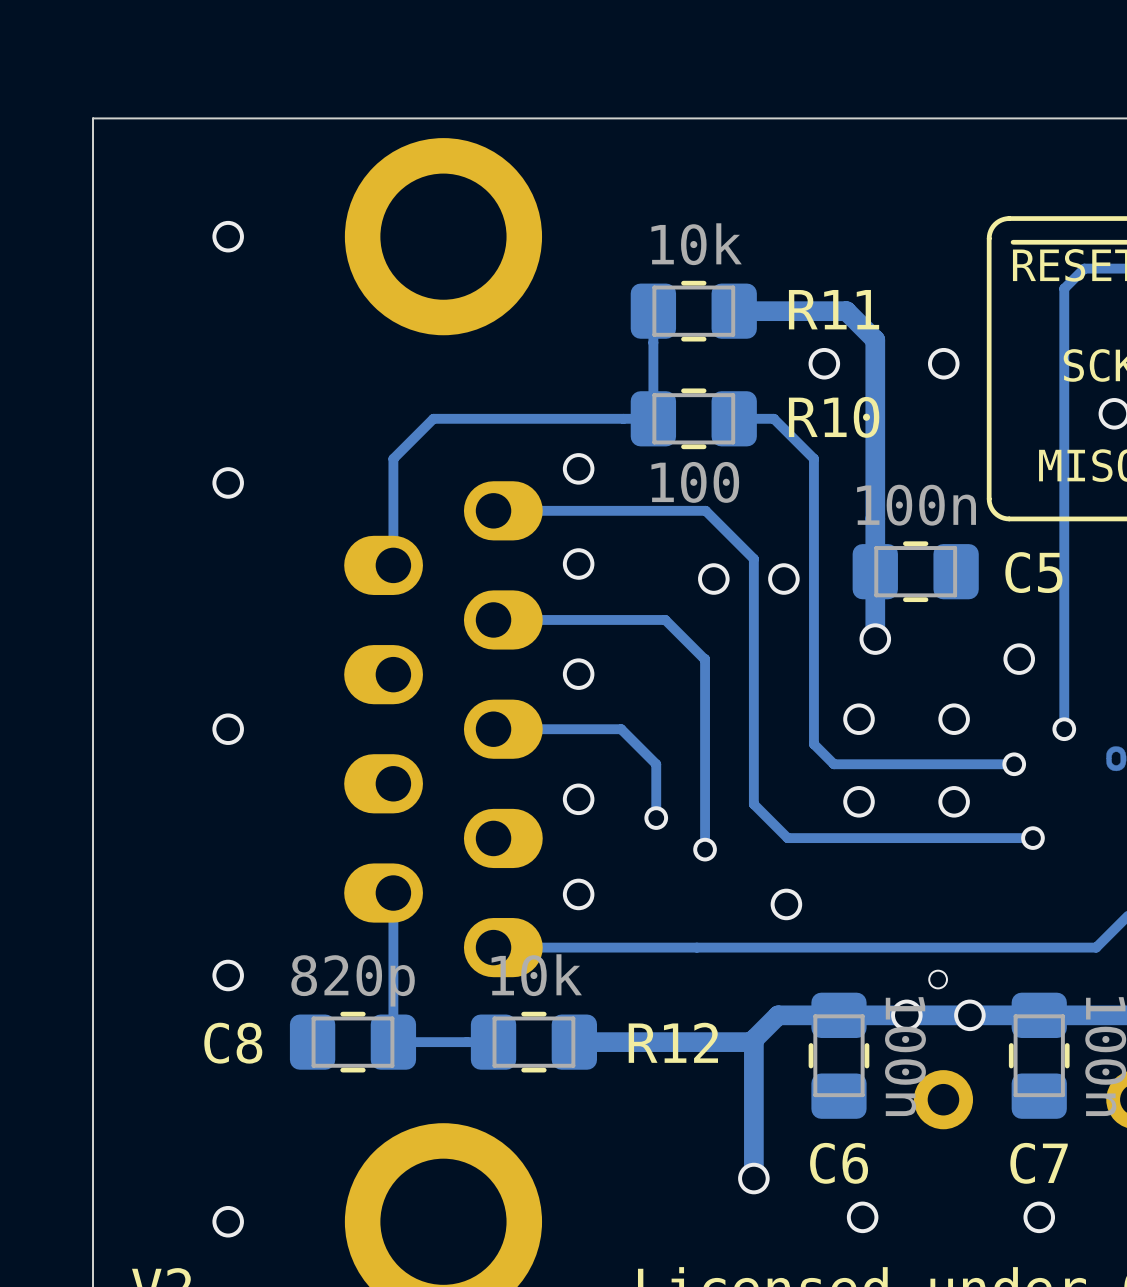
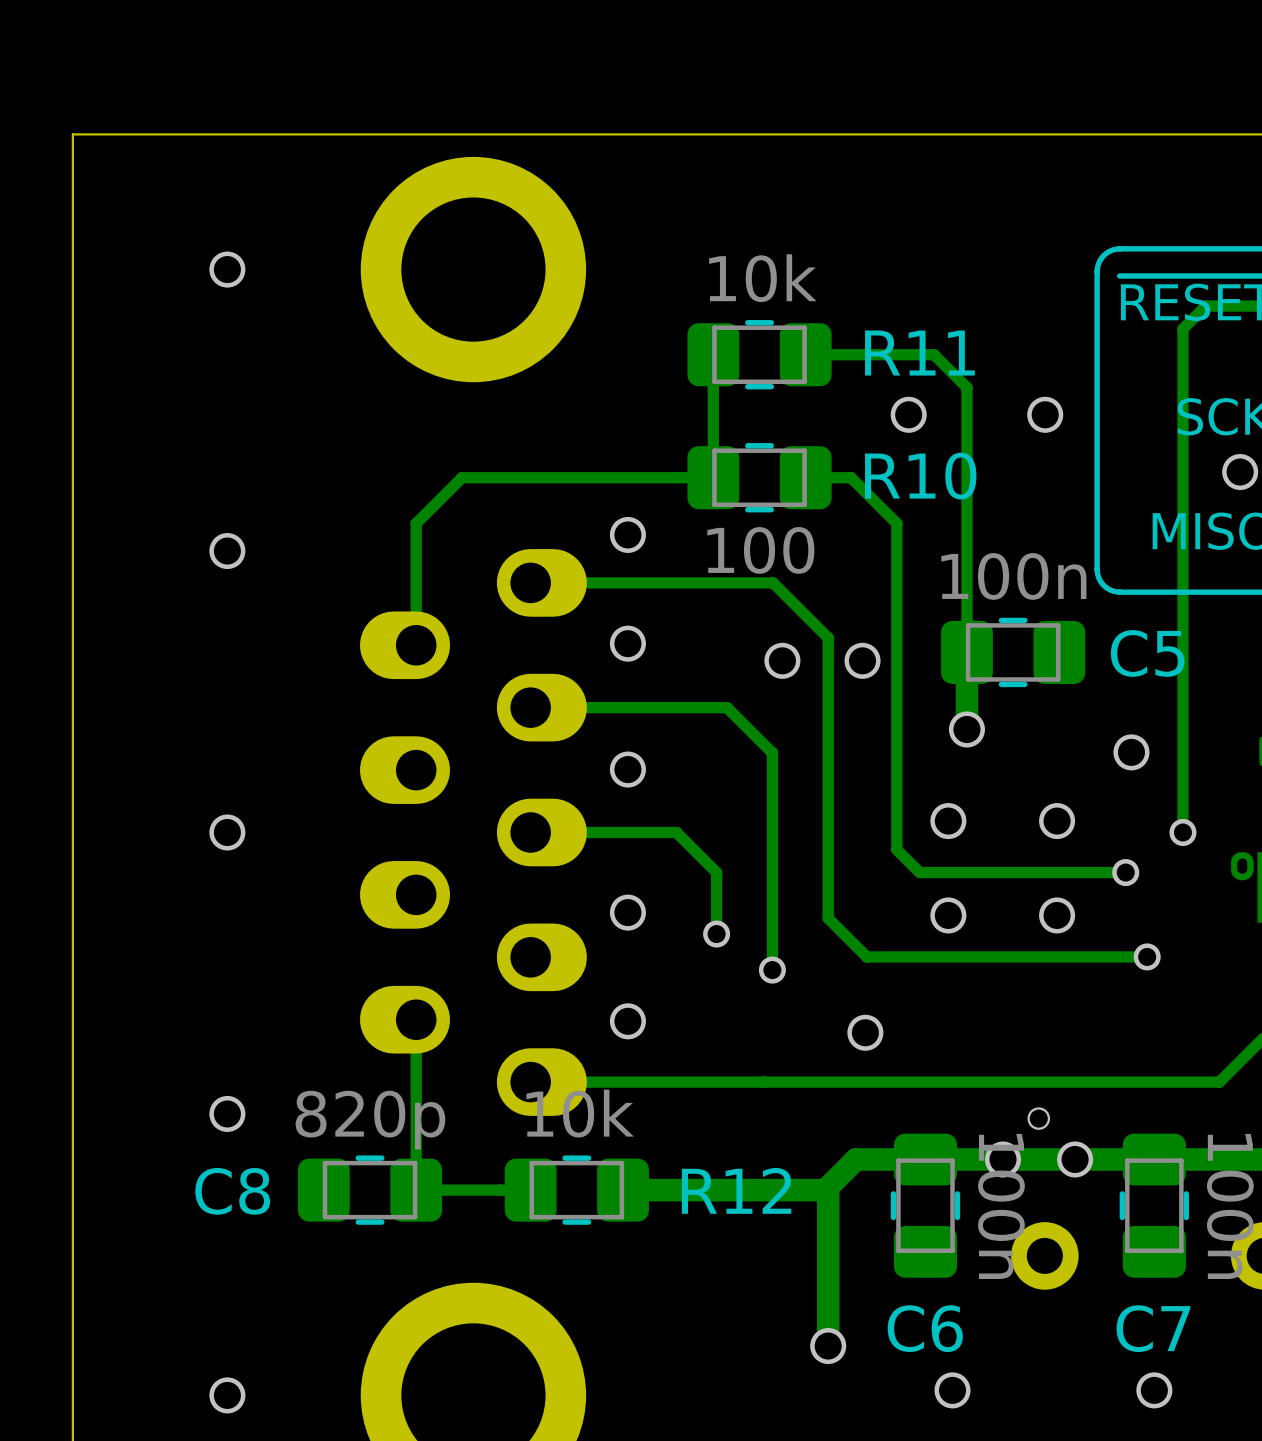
track width: thick (734, 311) (846, 311) (875, 339) (875, 571) -> thin (805, 354) (934, 354) (966, 387) (966, 652)

